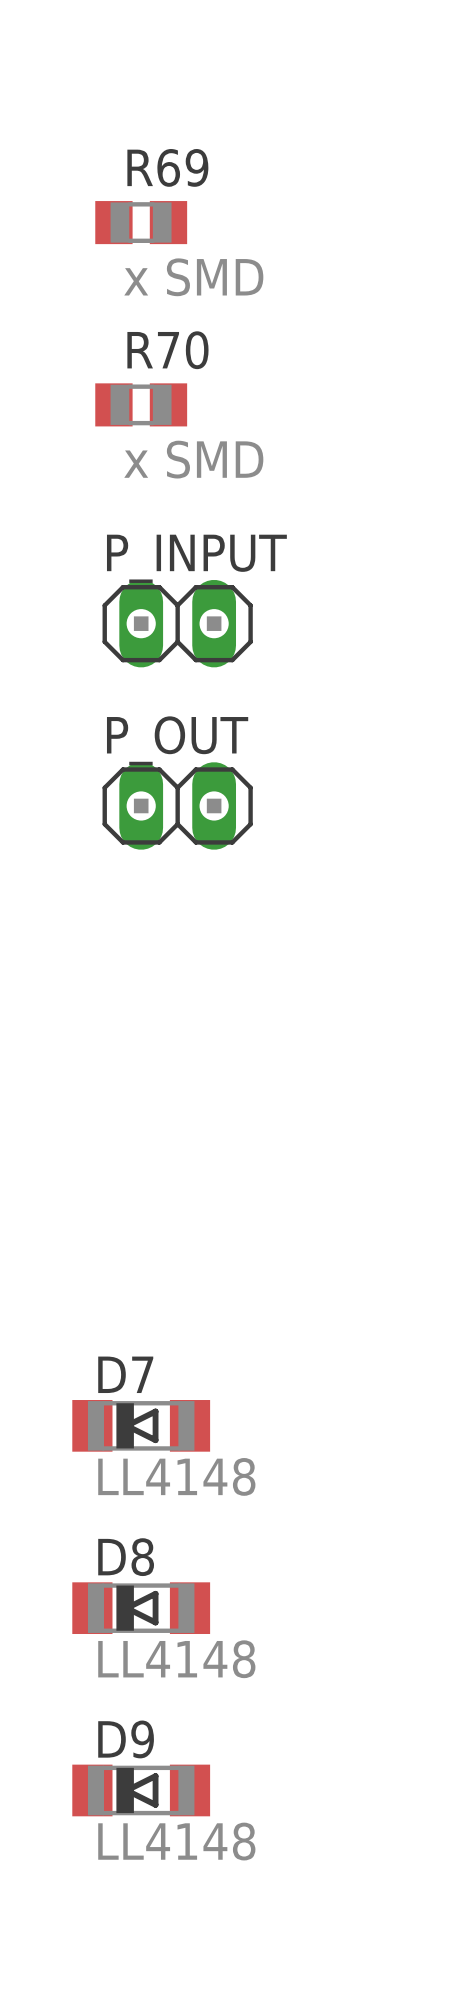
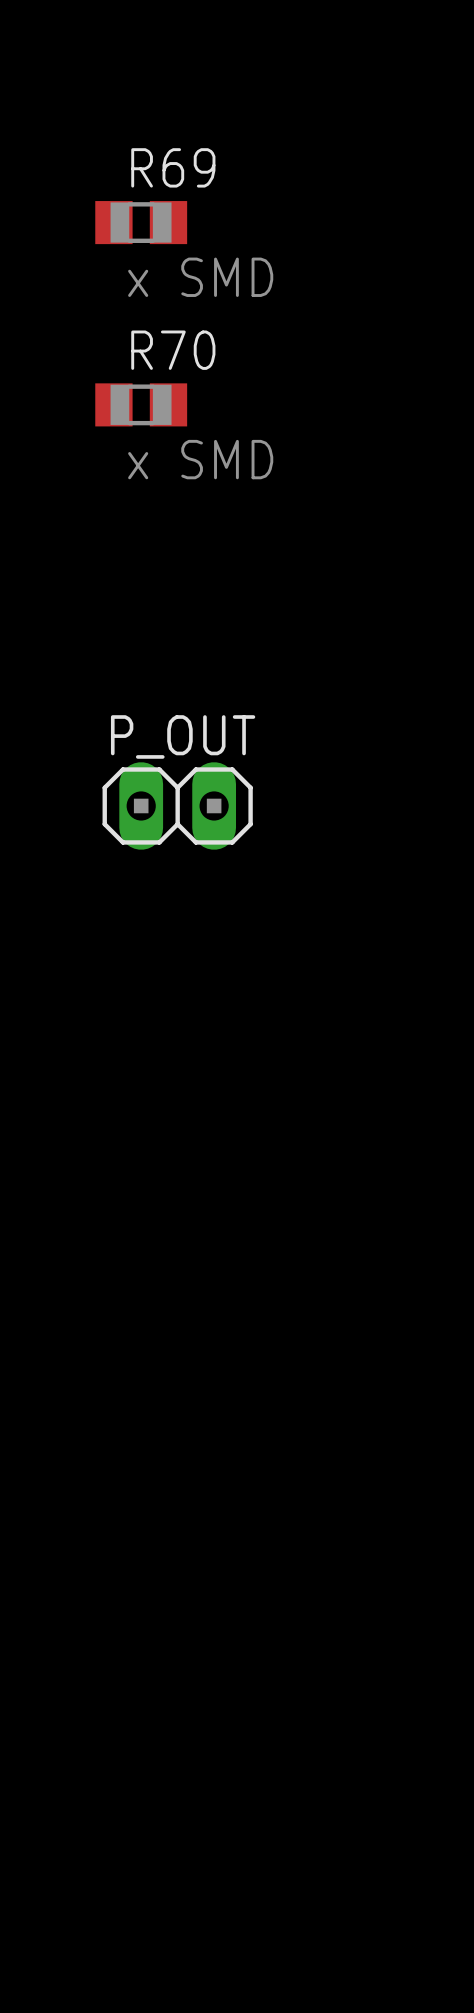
P_INPUT: (177, 623) -> none
D7: LL4148 (141, 1425) -> none
D8: LL4148 (141, 1608) -> none
D9: LL4148 (141, 1790) -> none

